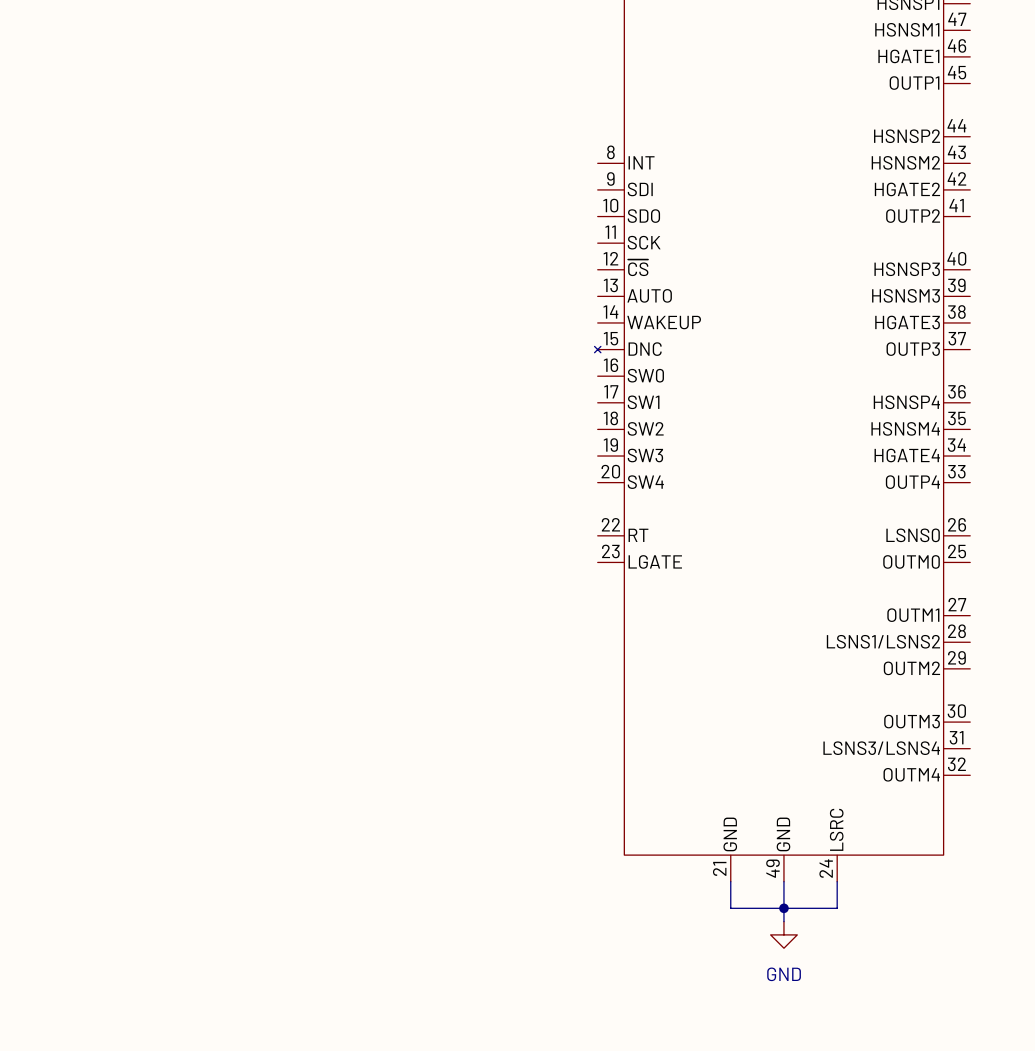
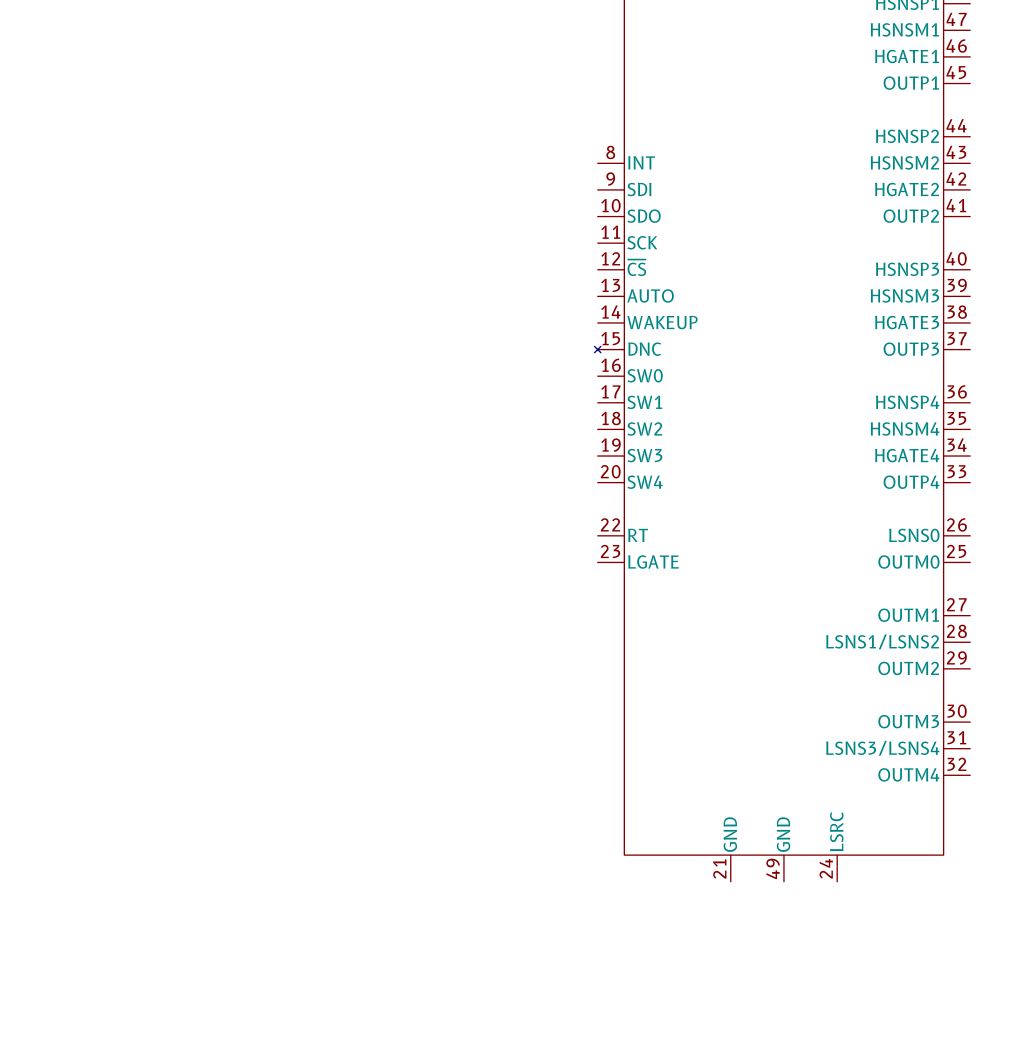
wire: (730, 881) (730, 908) (837, 908) (837, 881) -> none
wire: (783, 881) (783, 921) -> none
junction: (783, 908) -> none
power symbol: GND (783, 934) -> none

